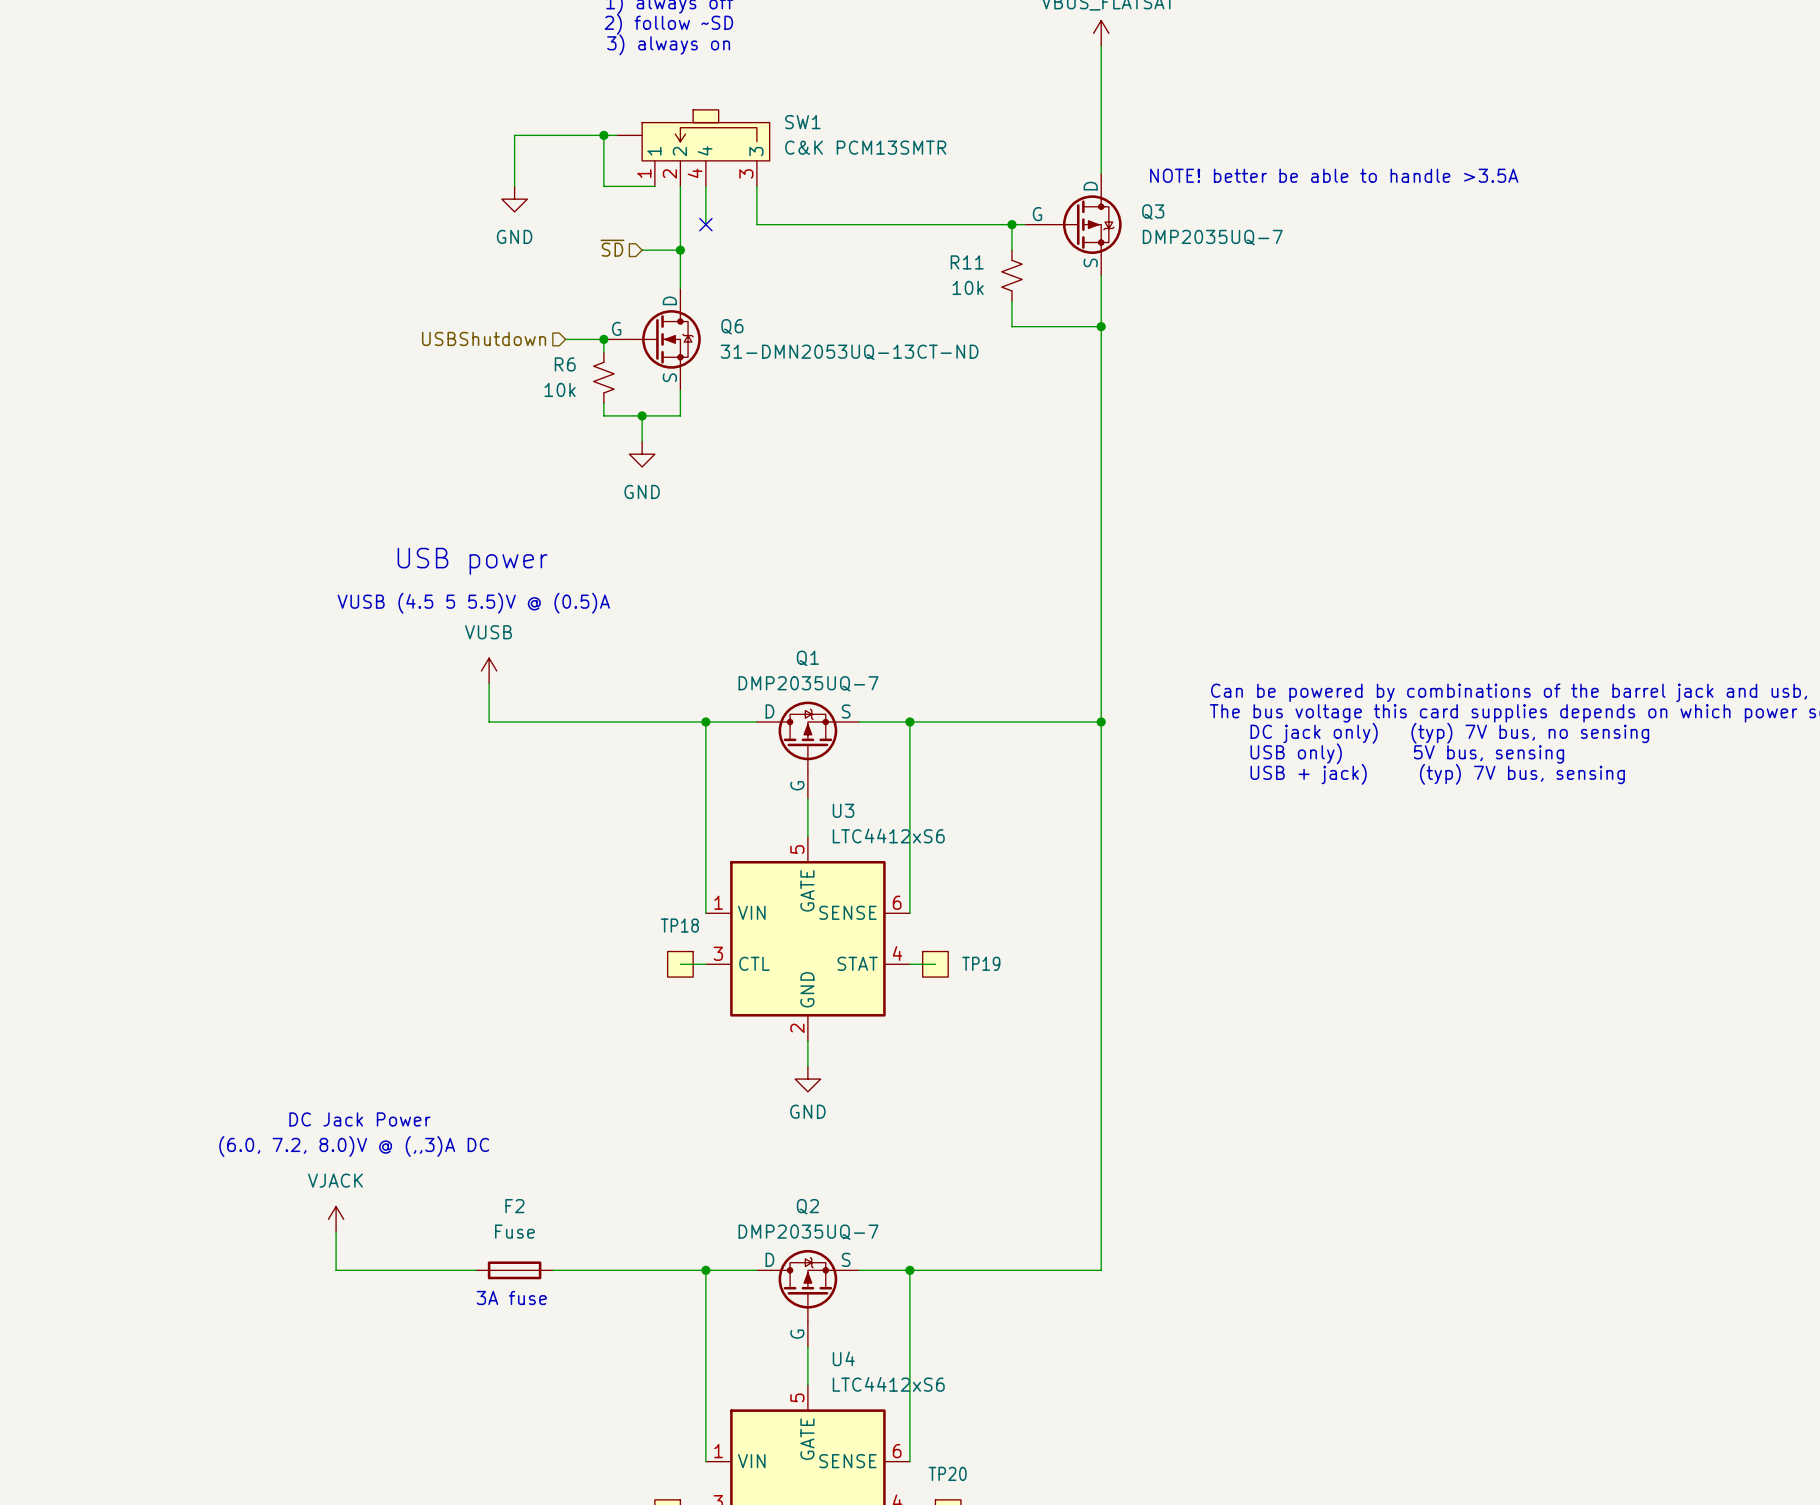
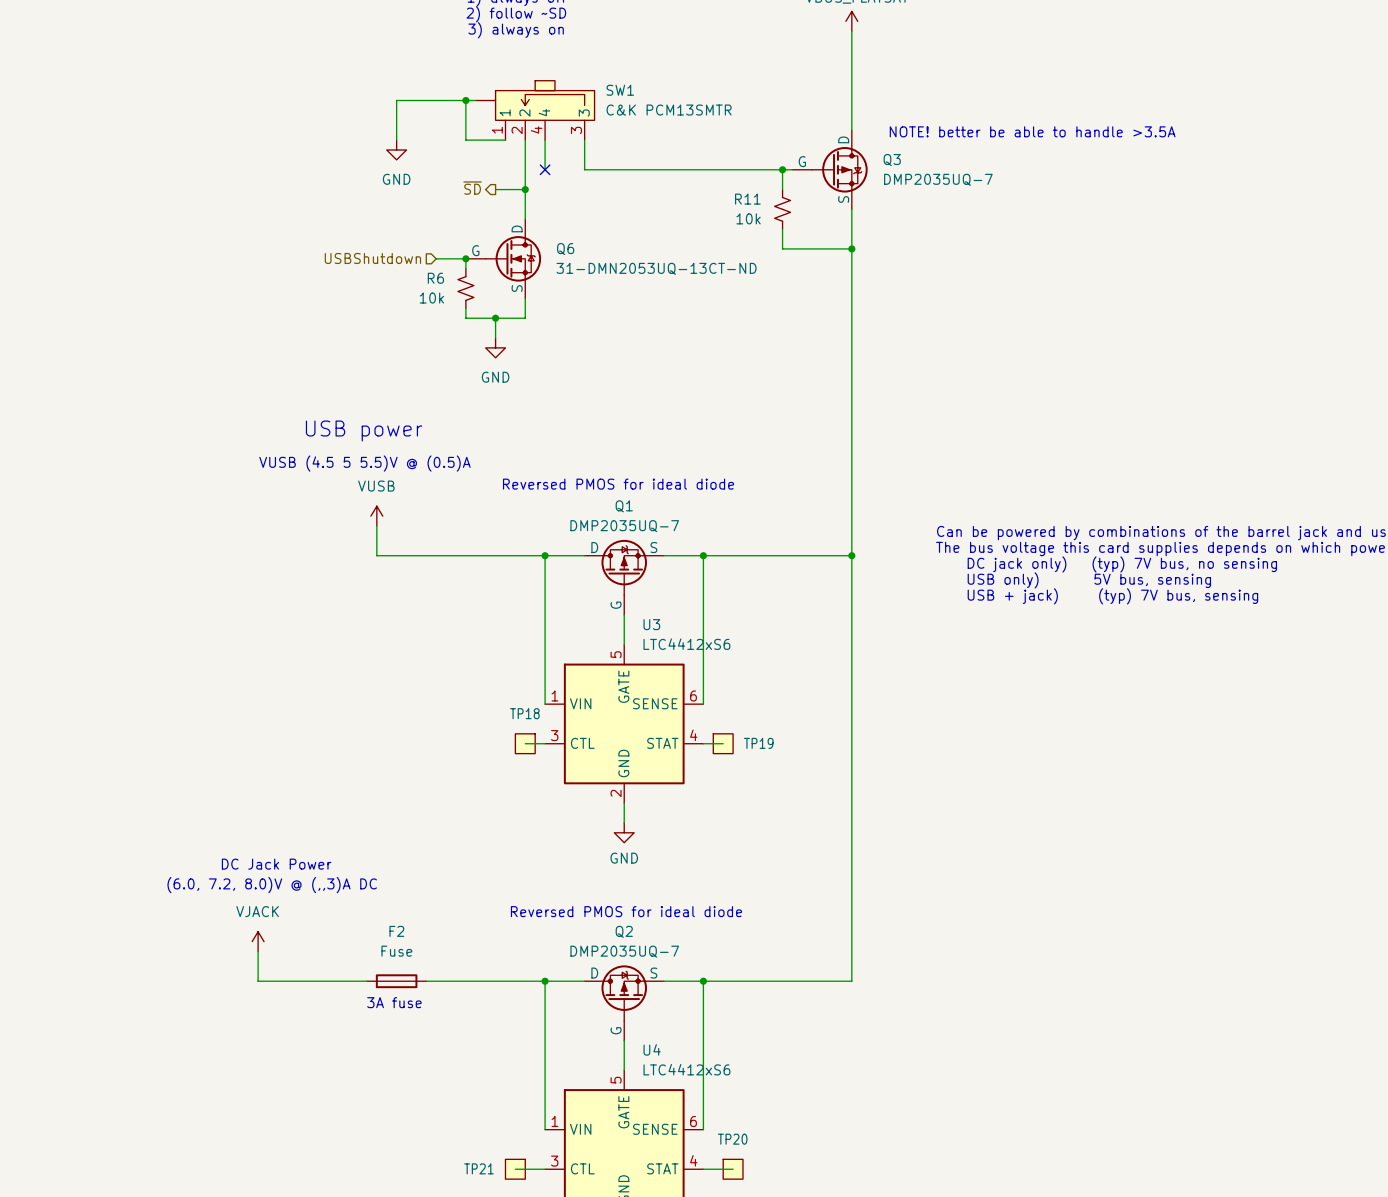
hierarchical label shape: input (612, 248) -> output (472, 188)
text: none -> Reversed PMOS for ideal diode (618, 484)
text: none -> Reversed PMOS for ideal diode (626, 911)

